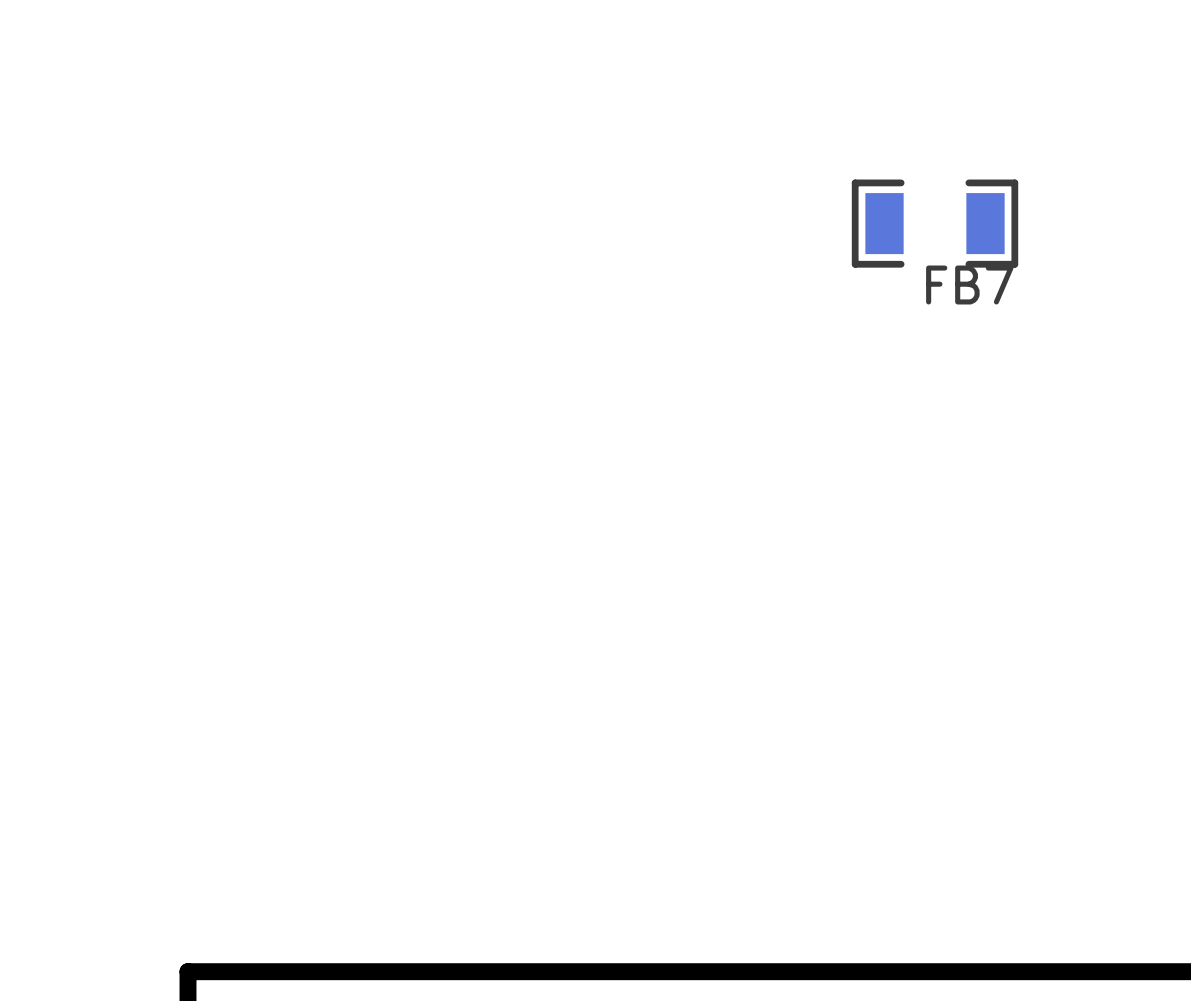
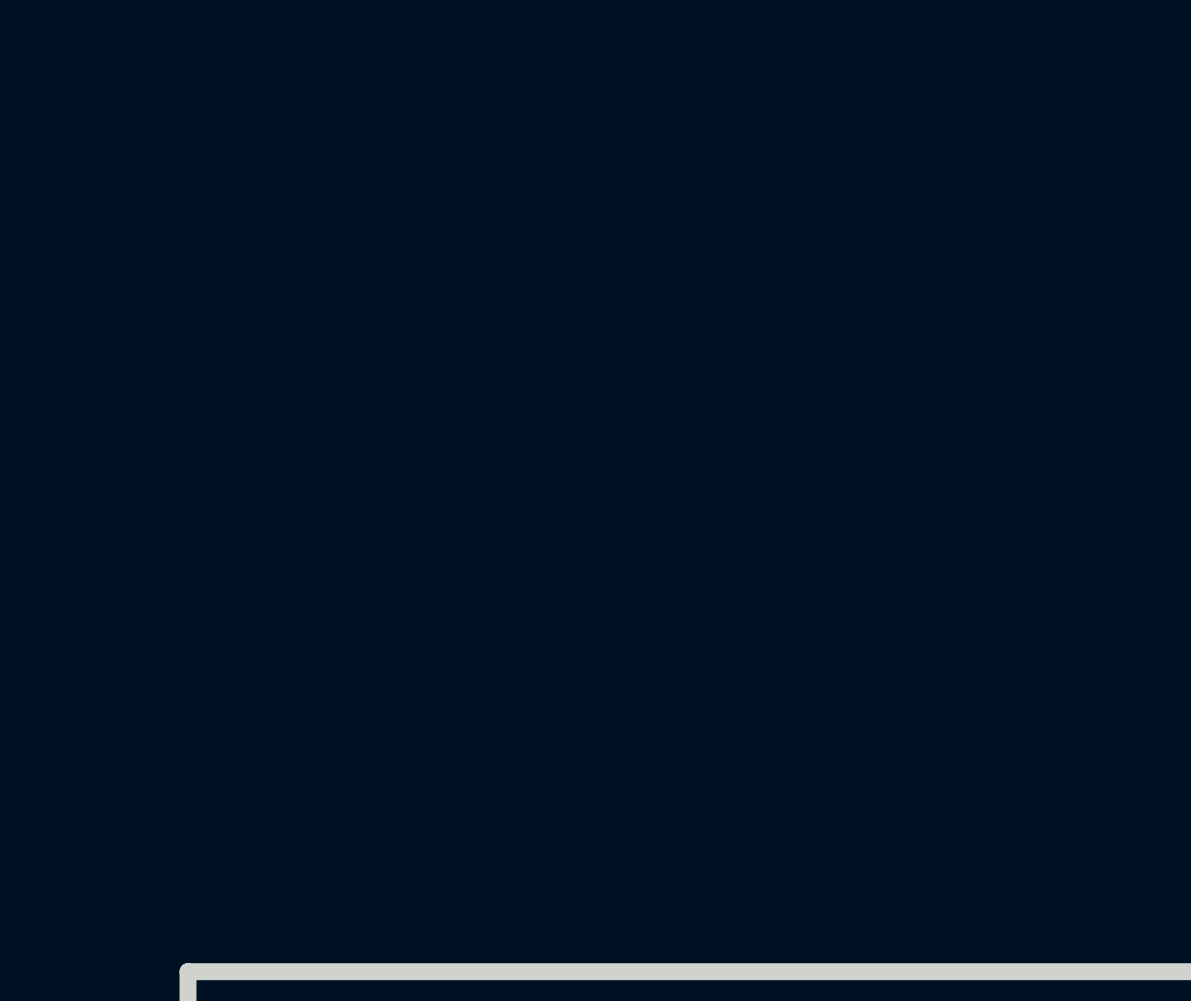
FB7: (935, 223) -> none

